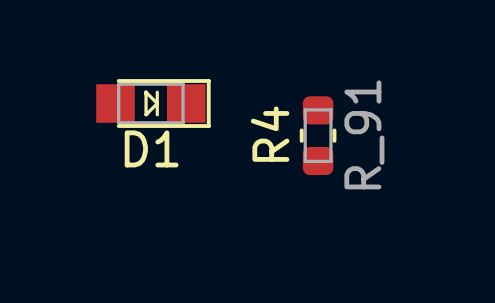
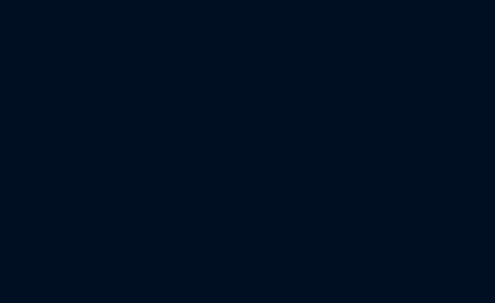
D1: (153, 103) -> none
R4: R_91 (318, 135) -> none

